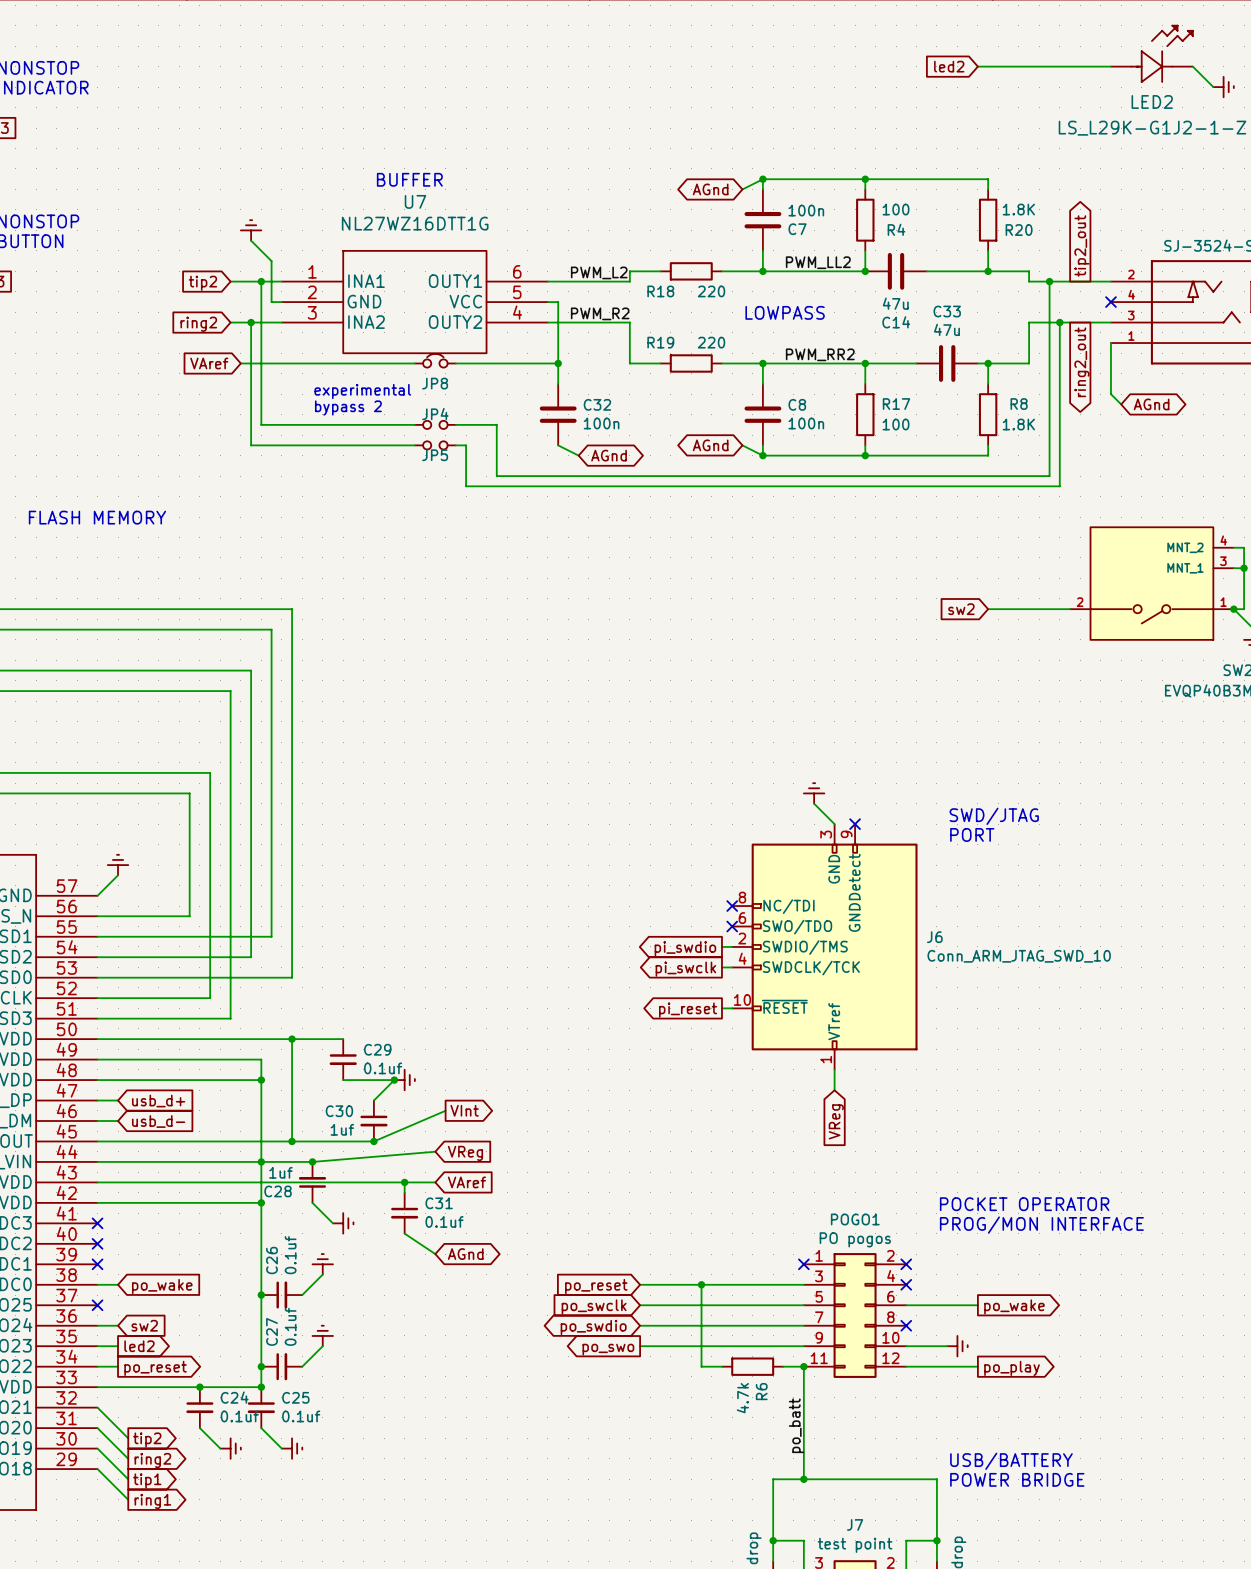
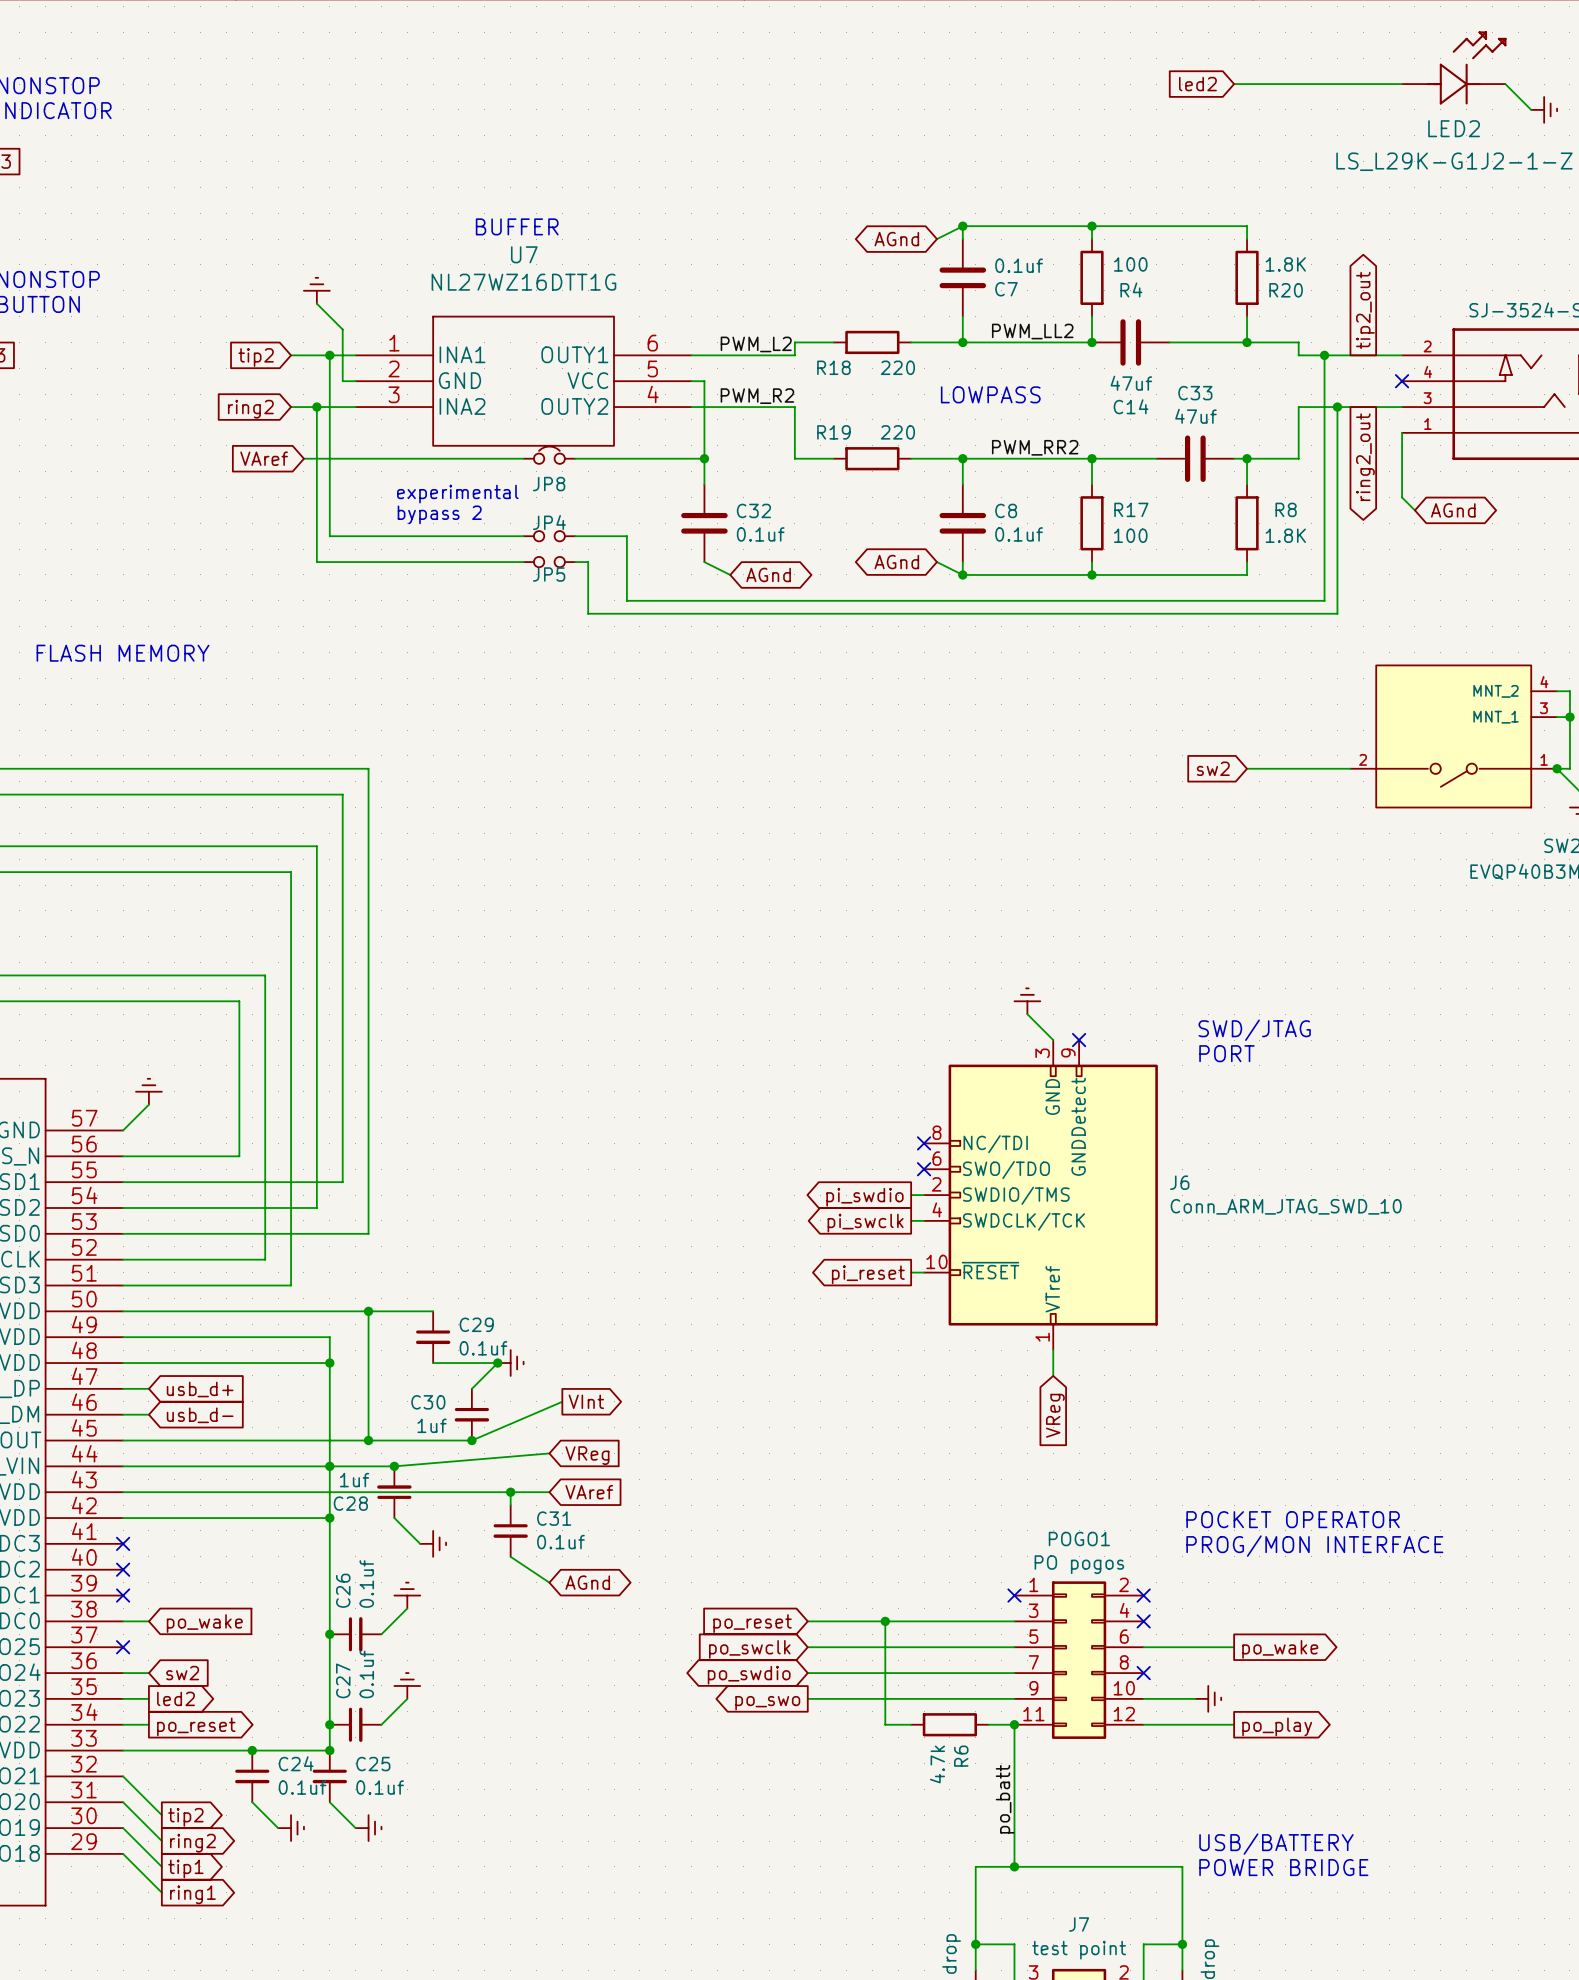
C7 value: 100n (806, 210) -> 0.1uf (1019, 265)
C14 value: 47u (895, 303) -> 47uf (1131, 383)
C33 value: 47u (946, 329) -> 47uf (1195, 416)
C32 value: 100n (601, 423) -> 0.1uf (760, 534)
C8 value: 100n (806, 423) -> 0.1uf (1019, 534)

